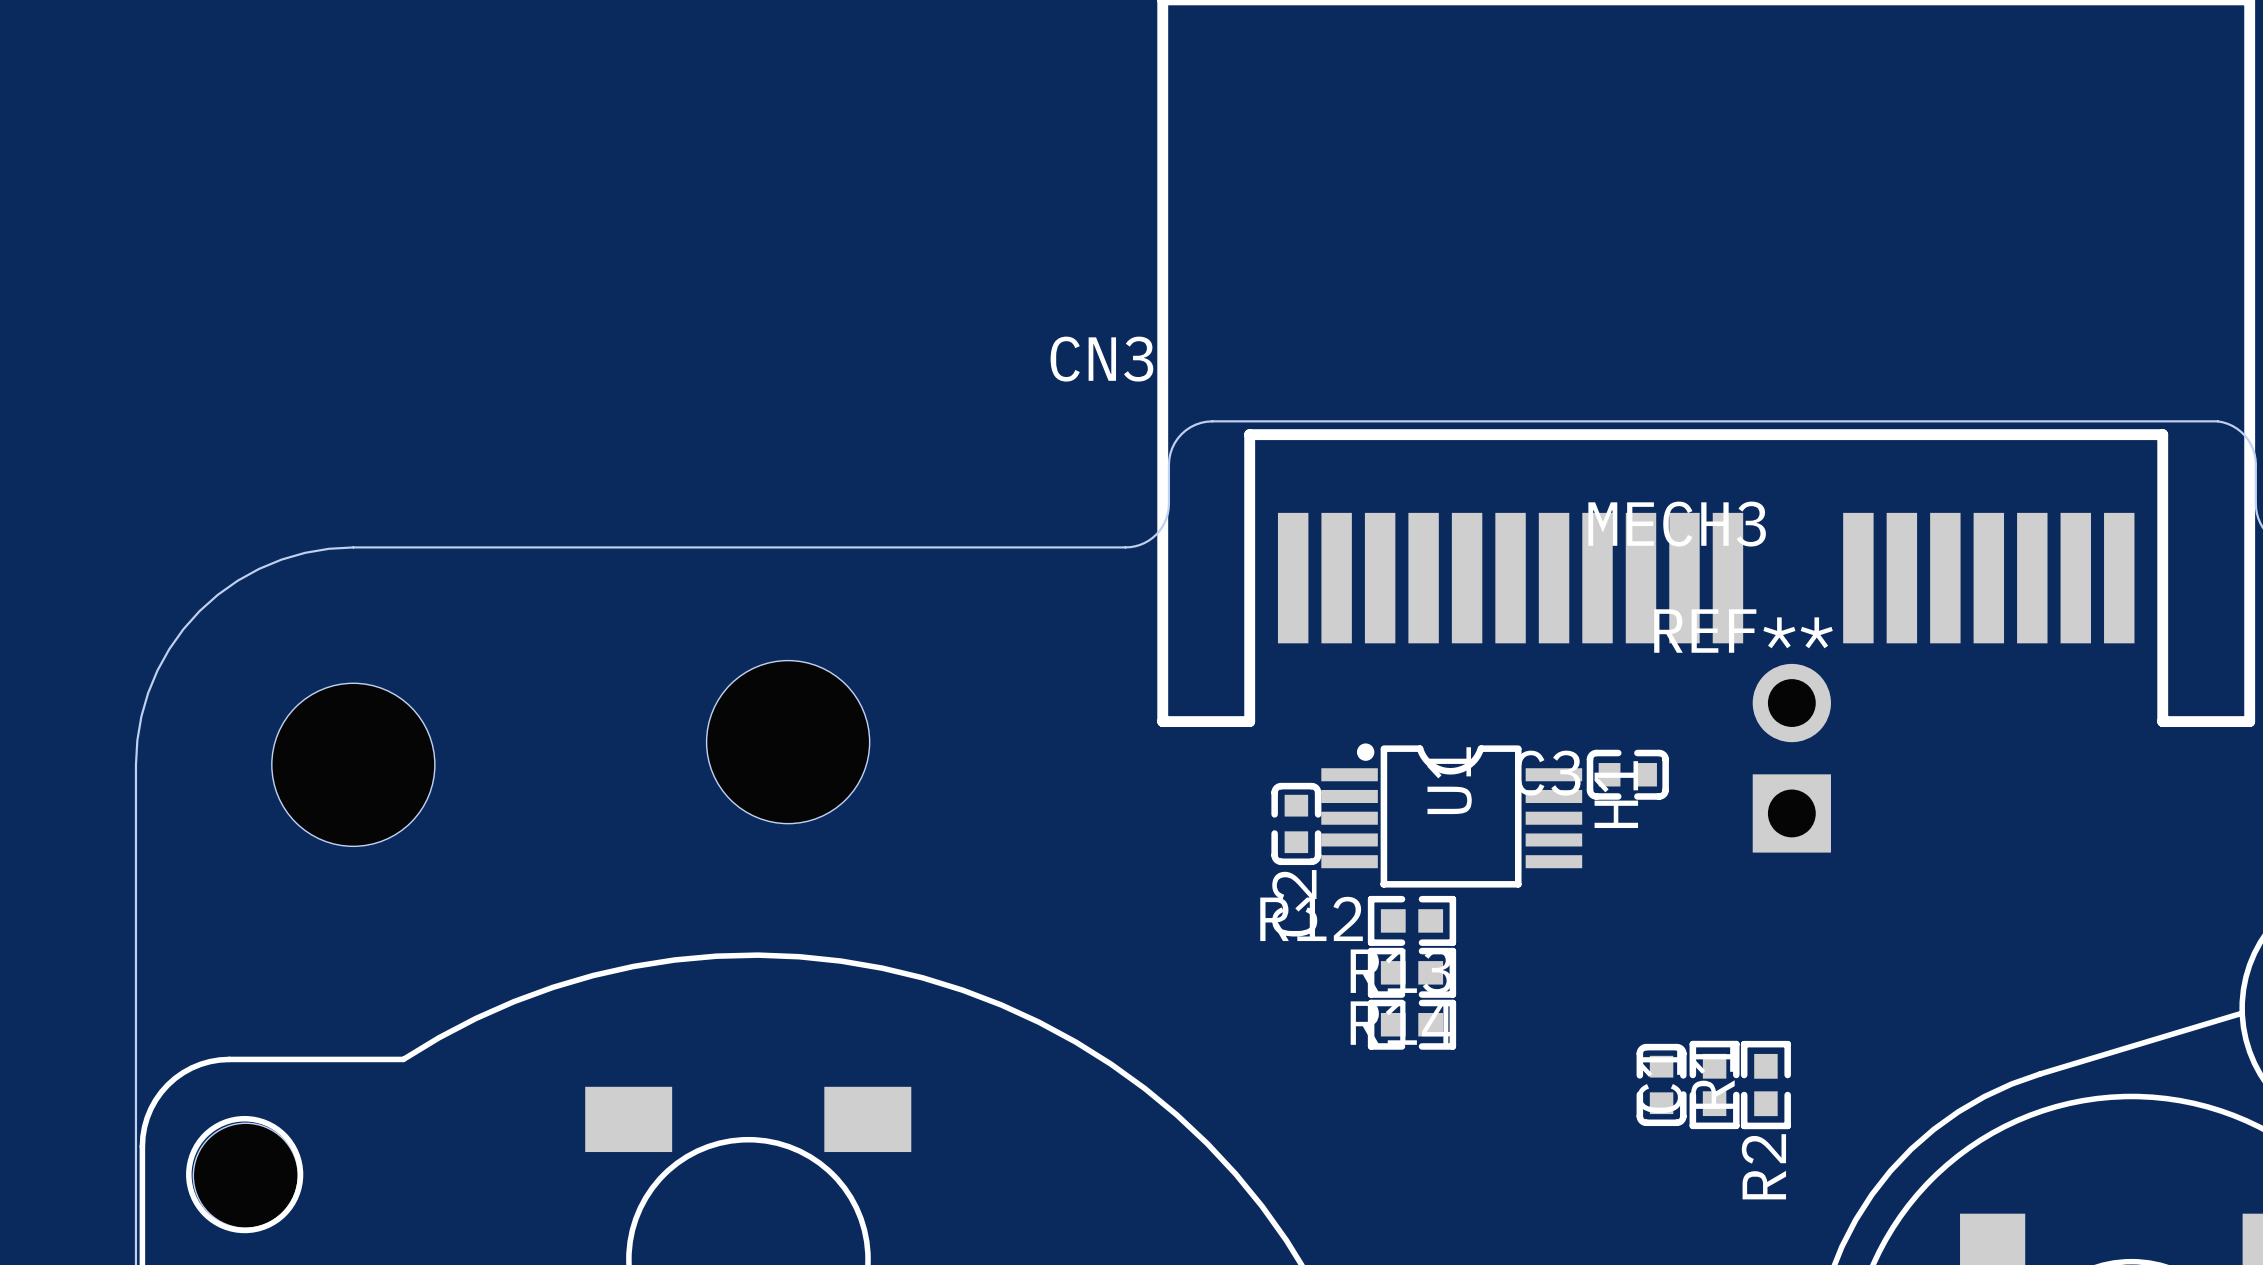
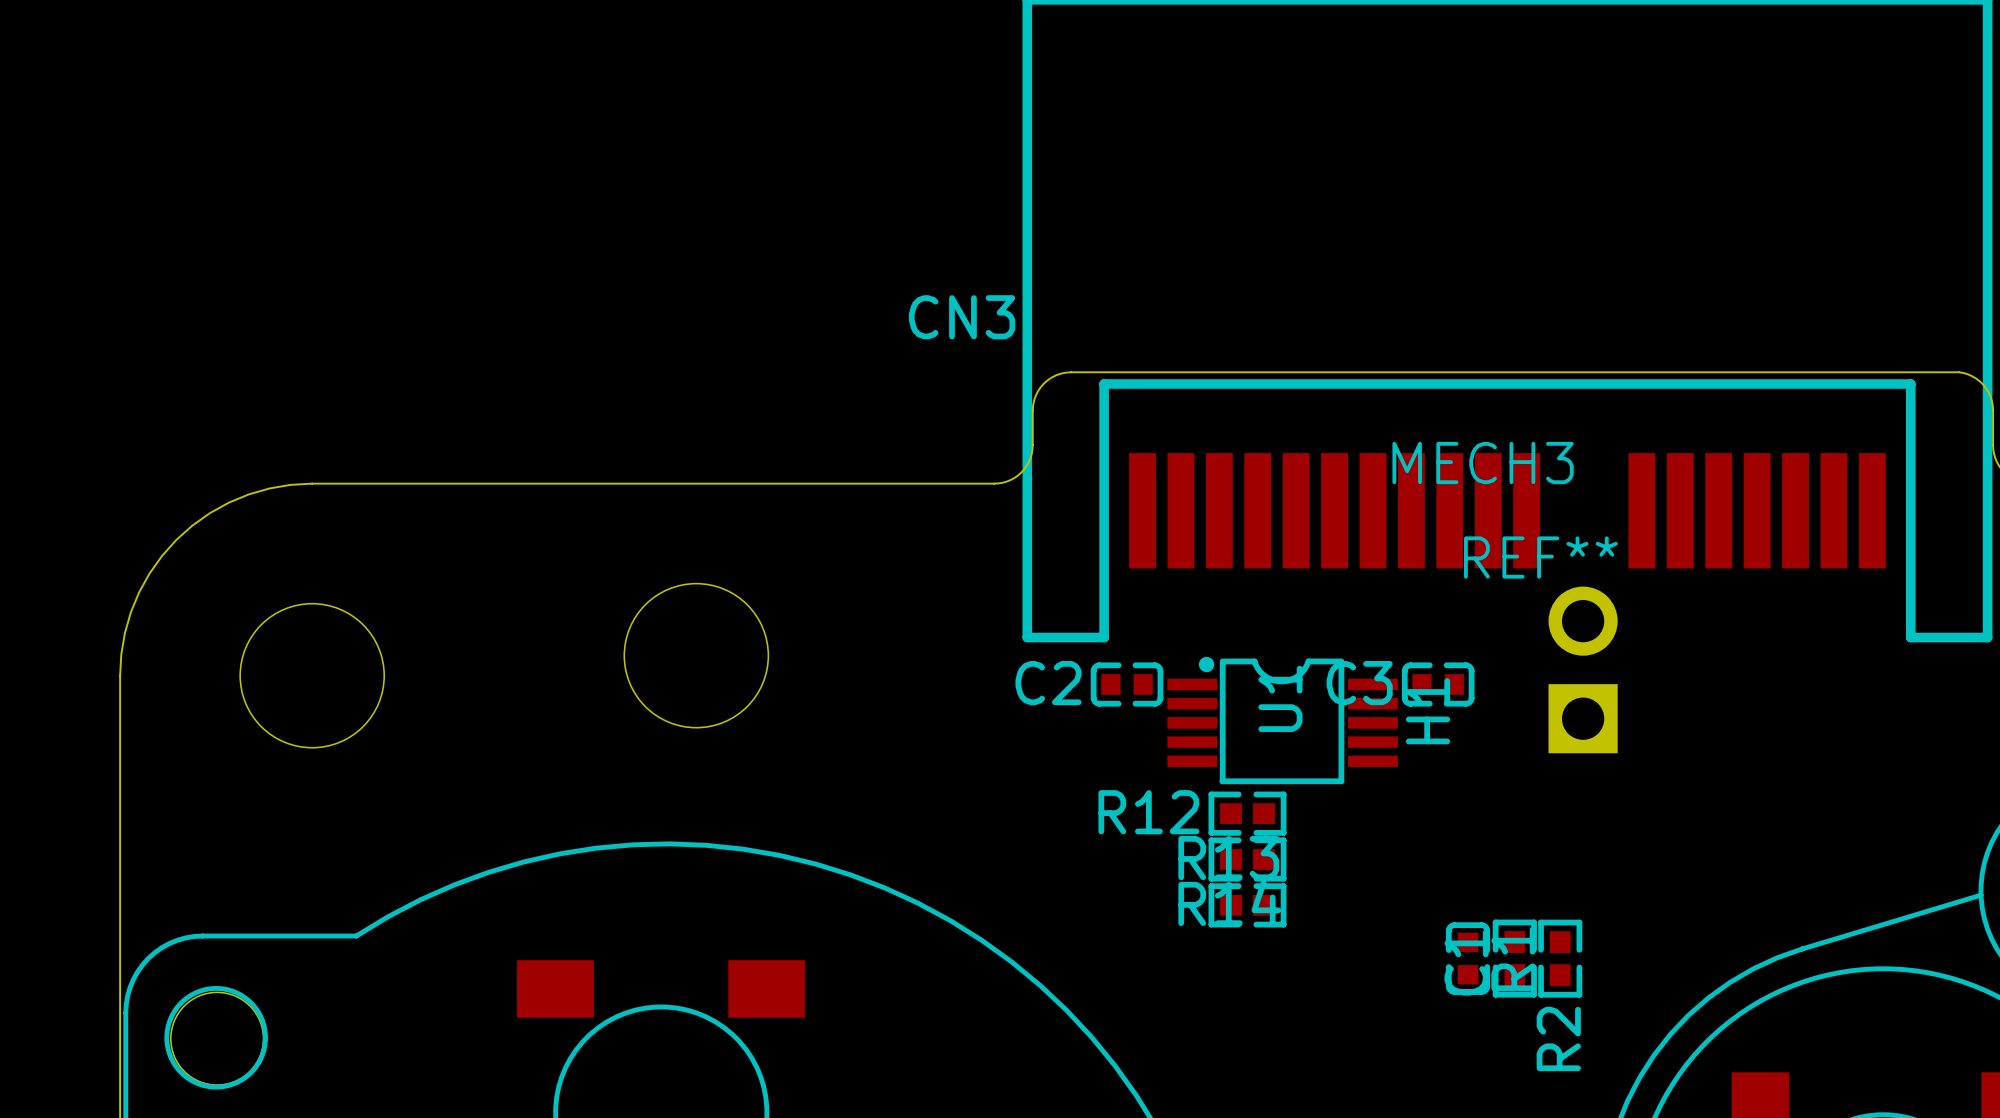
C2 rotation: 0° (1296, 823) -> 90° clockwise (1127, 684)
C2 position: (1296, 823) -> (1127, 684)

